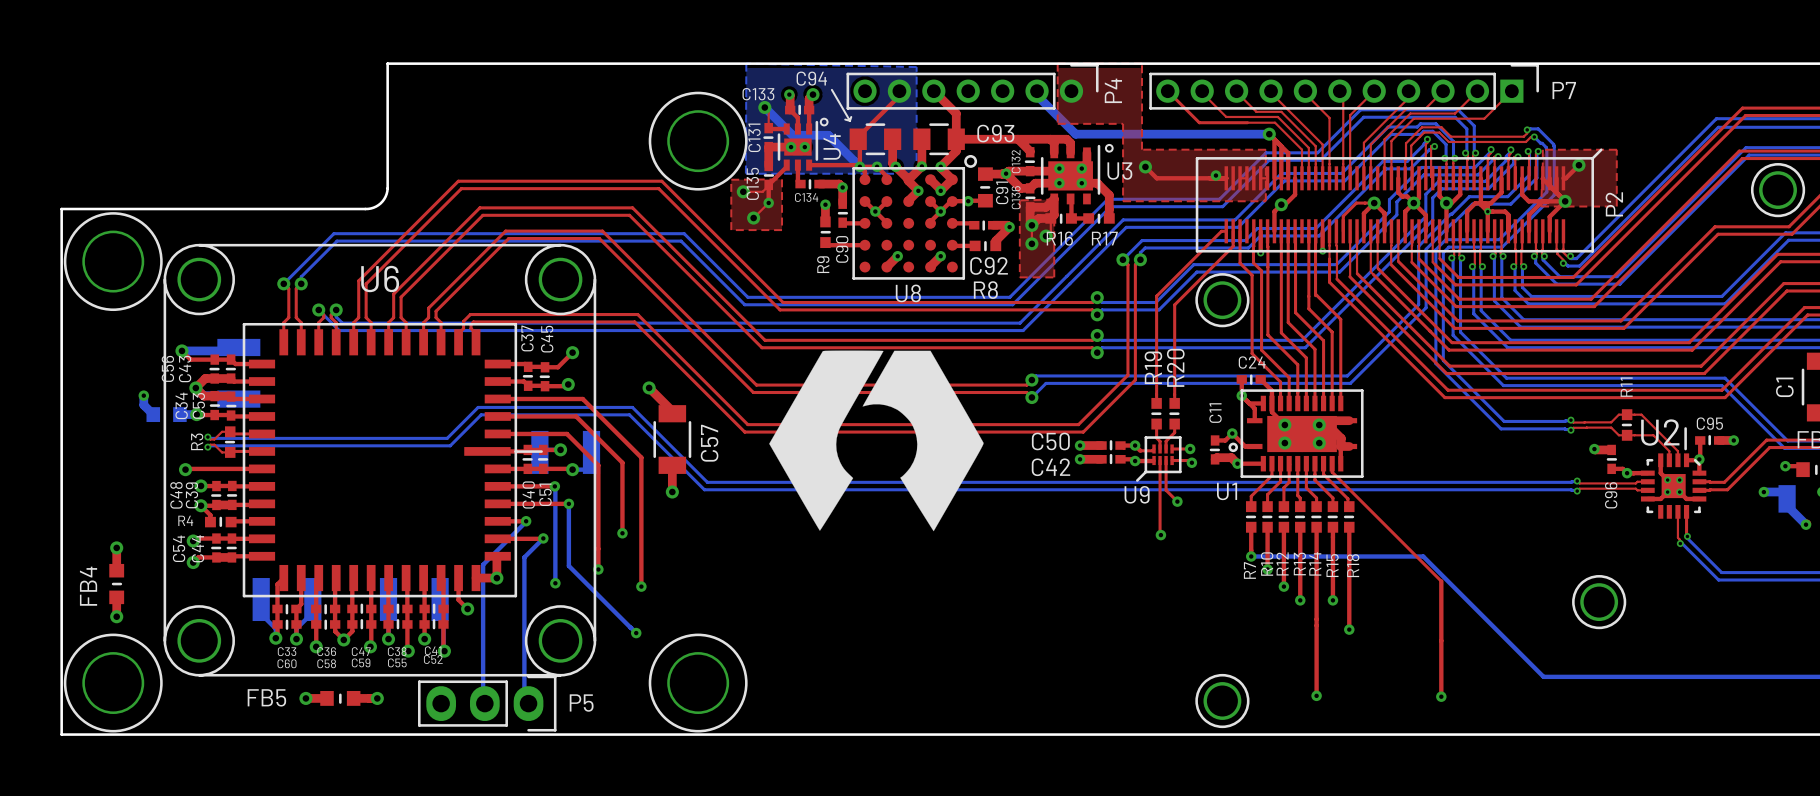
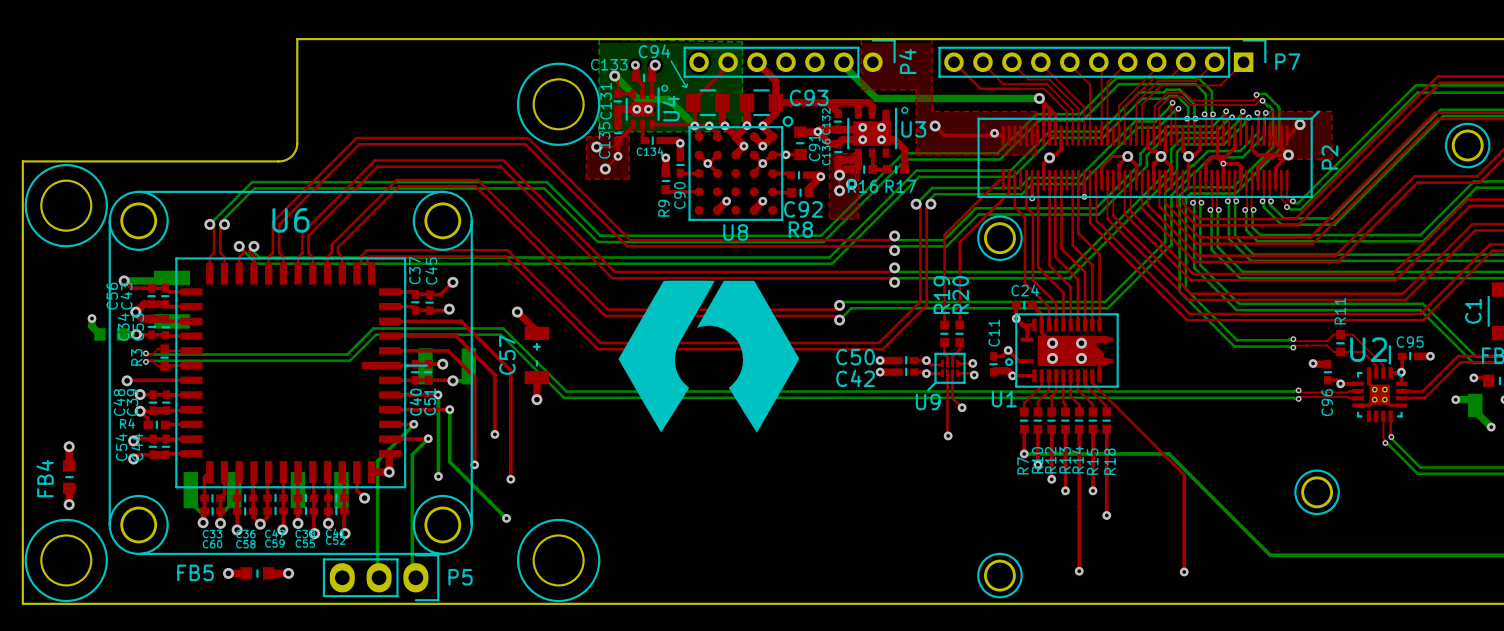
C57 footprint: [653, 405, 692, 474] -> [524, 326, 550, 385]
C57 name position: C57 (709, 443) -> C57 (507, 355)

